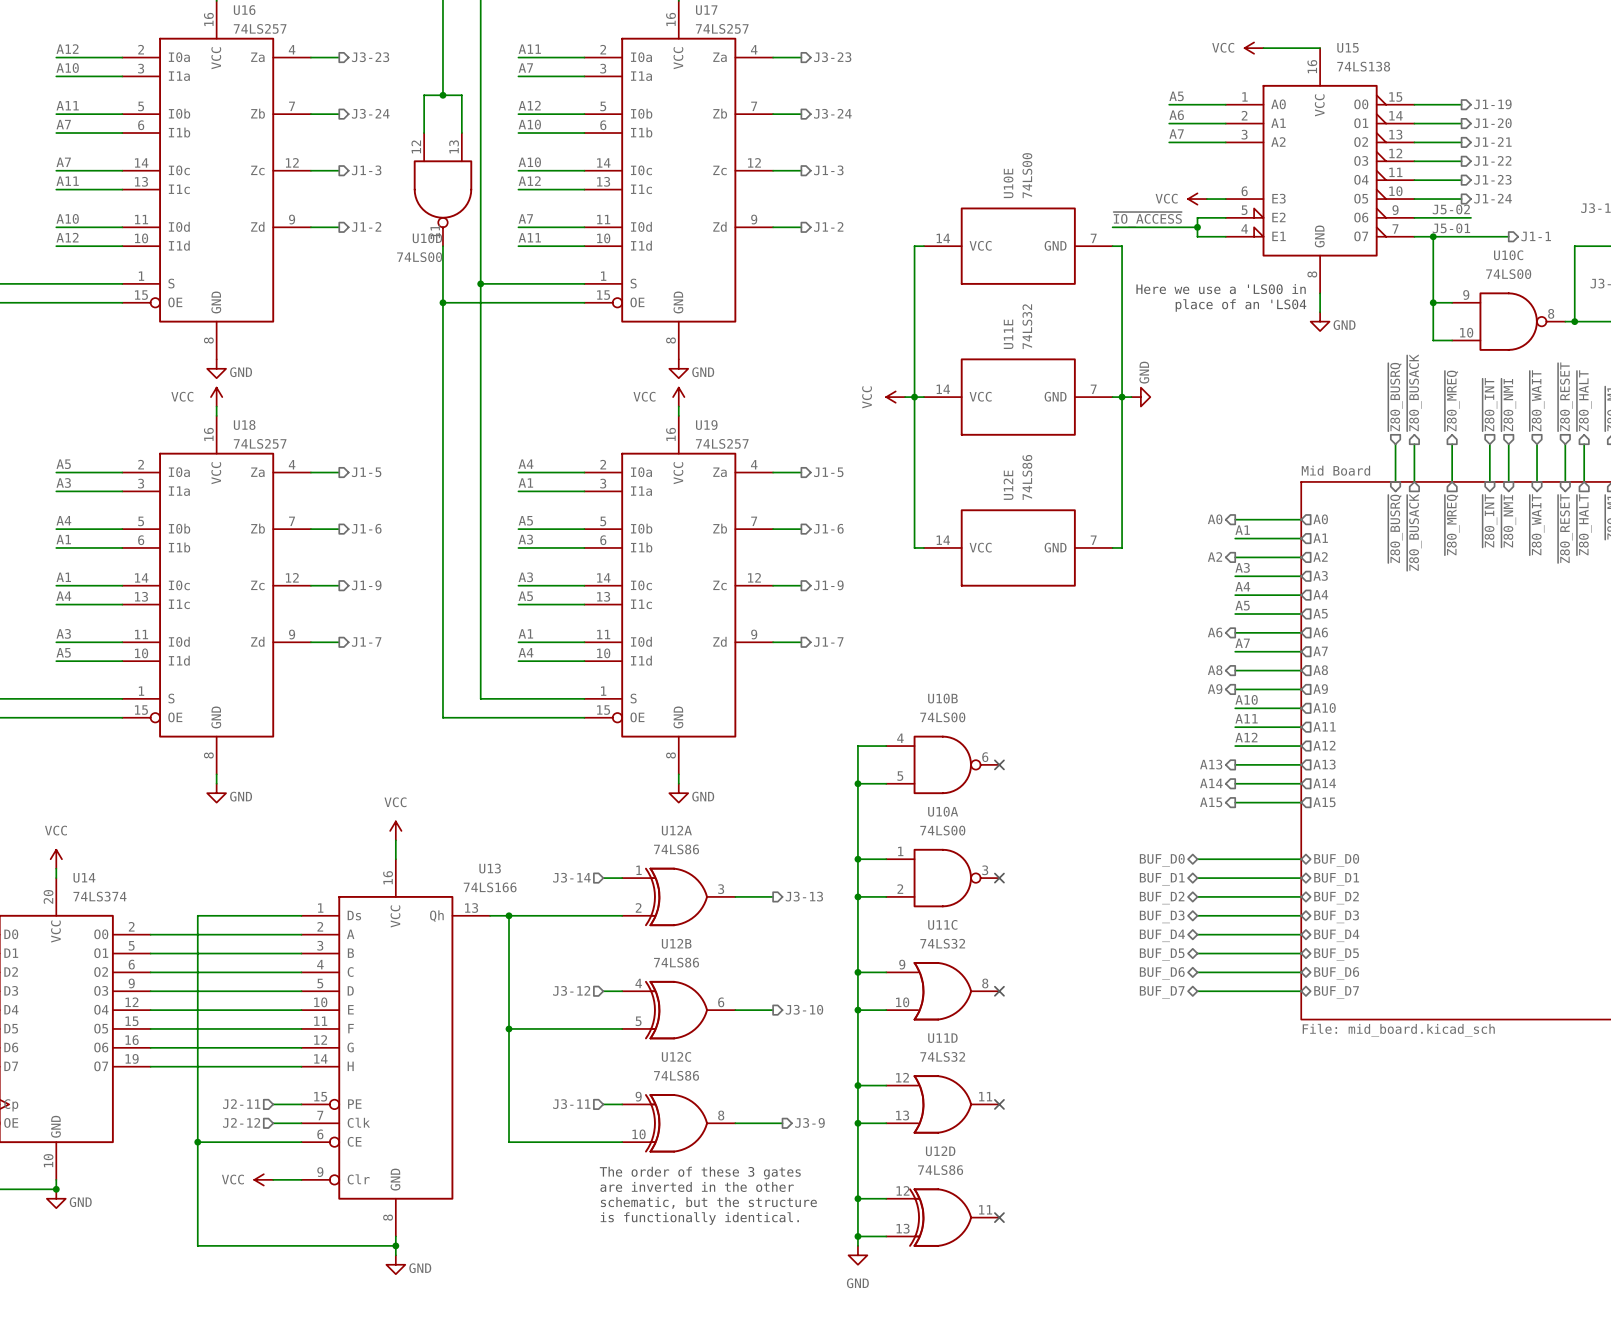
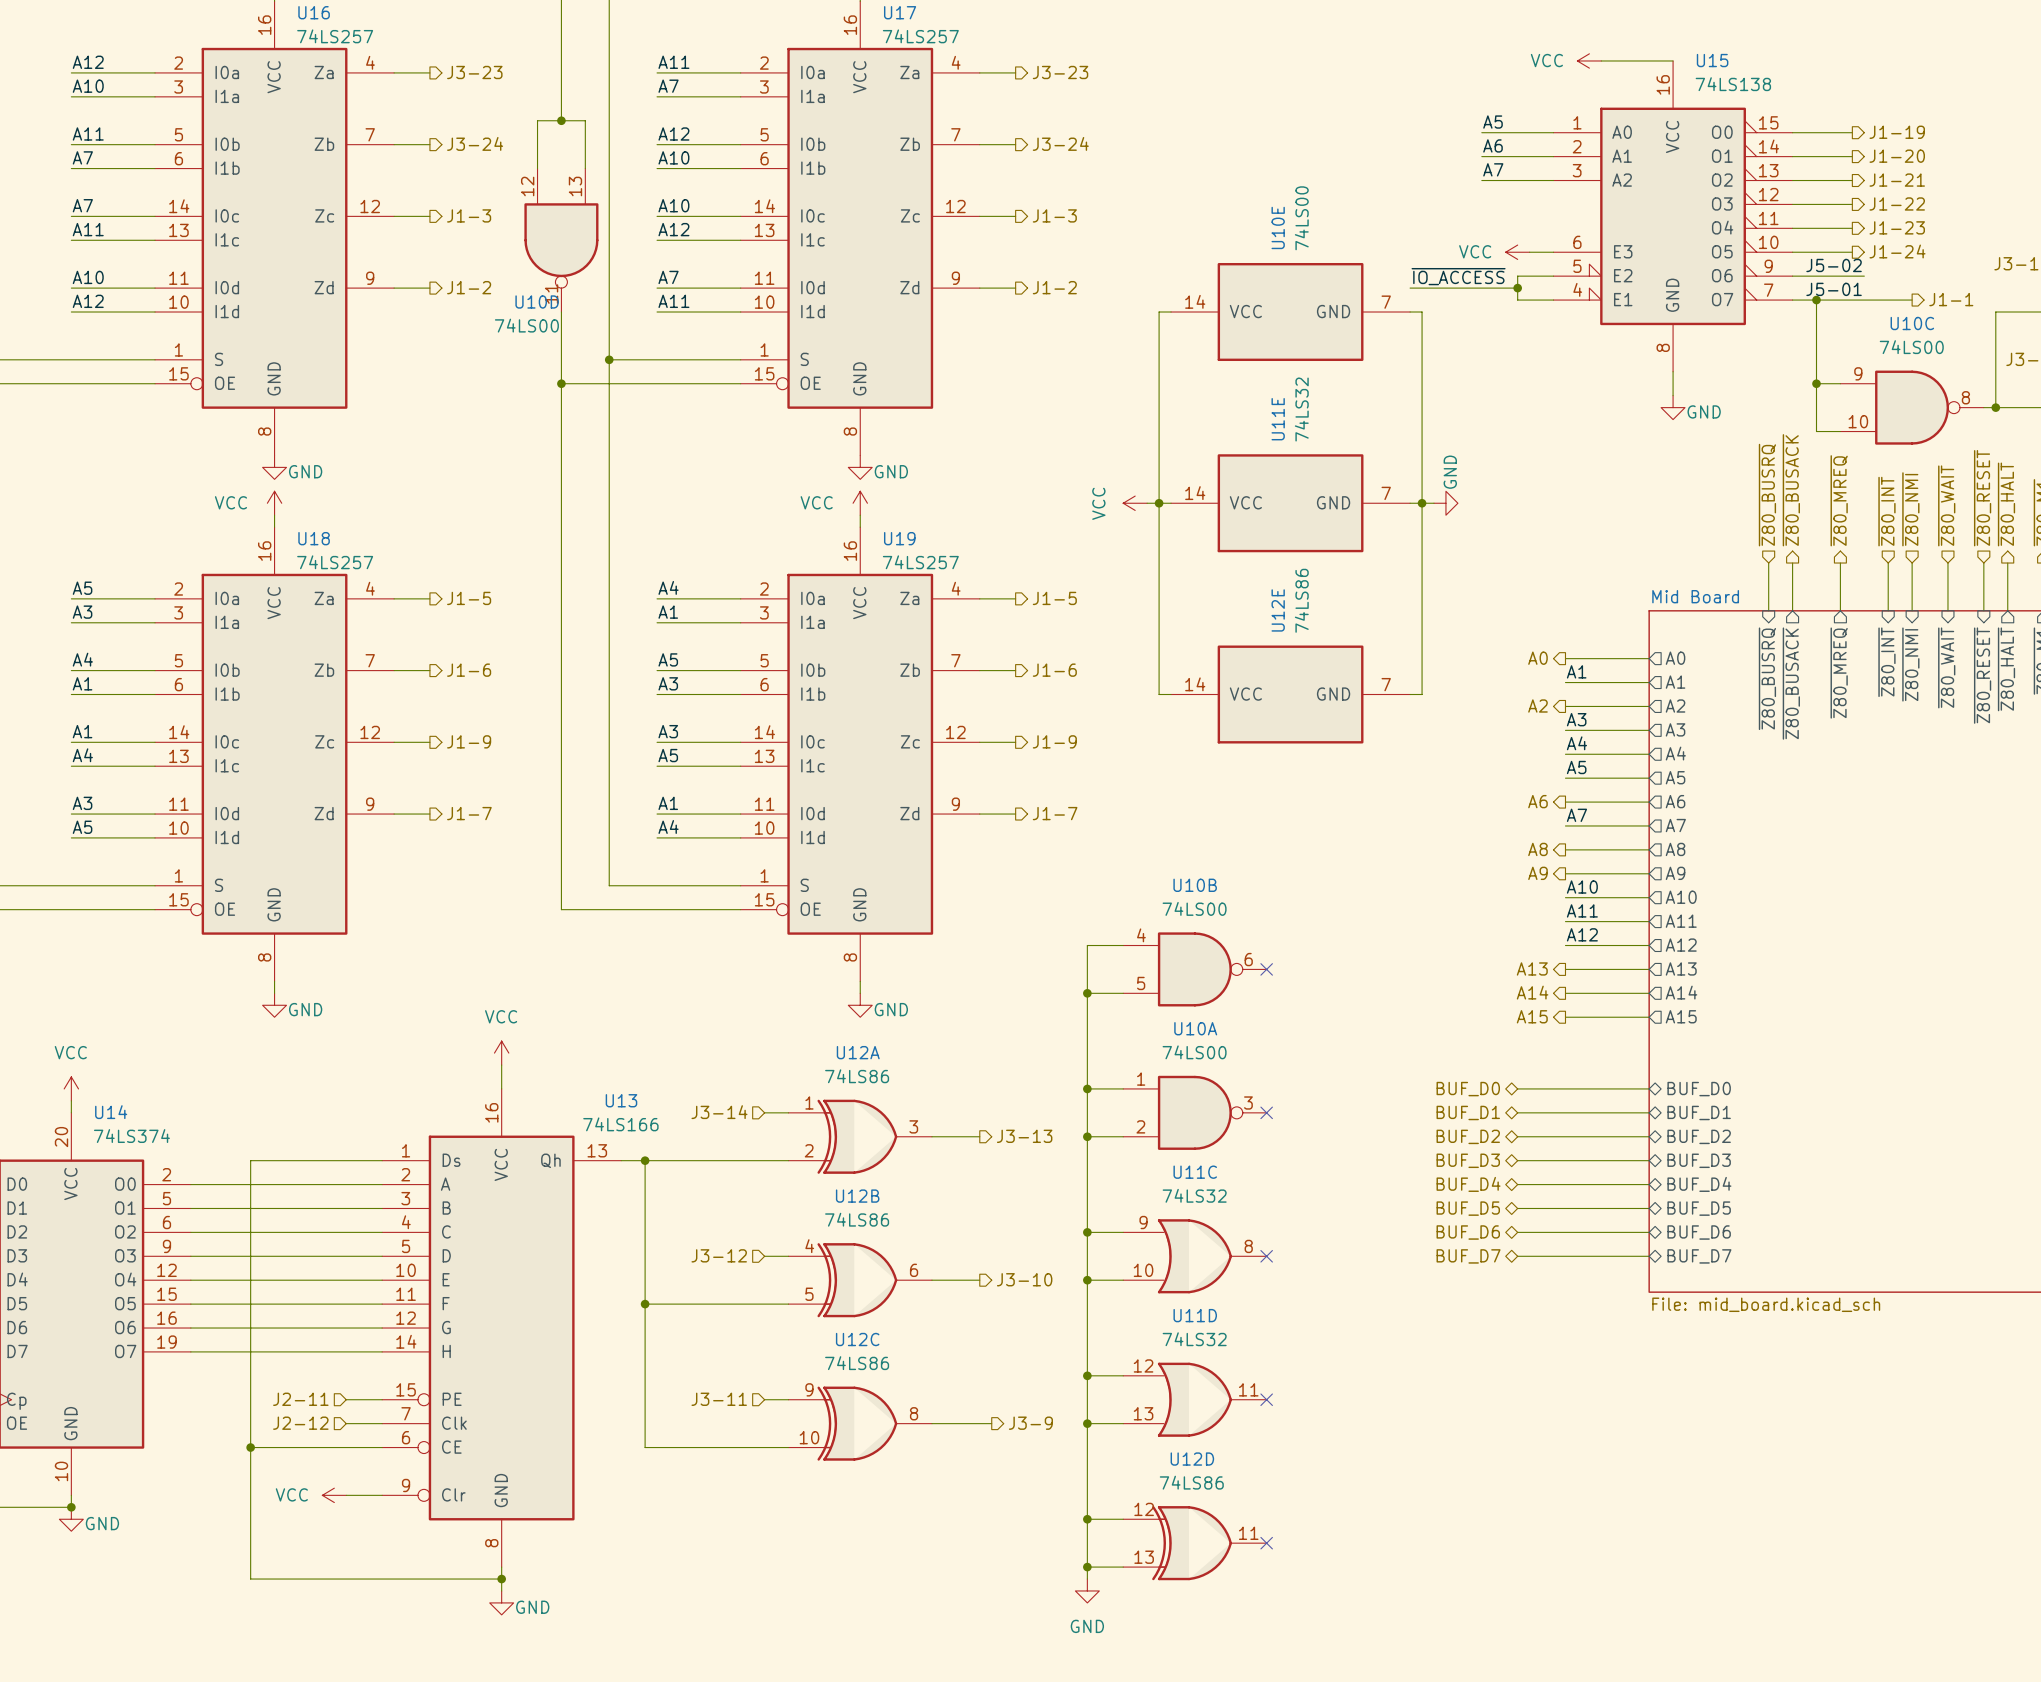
text: Here we use a 'LS00 in (1221, 289) -> none
text: place of an 'LS04 (1240, 305) -> none
text: The order of these 3 gates (700, 1173) -> none
text: are inverted in the other (697, 1186) -> none
text: schematic, but the structure (708, 1202) -> none
text: is functionally identical. (699, 1218) -> none

